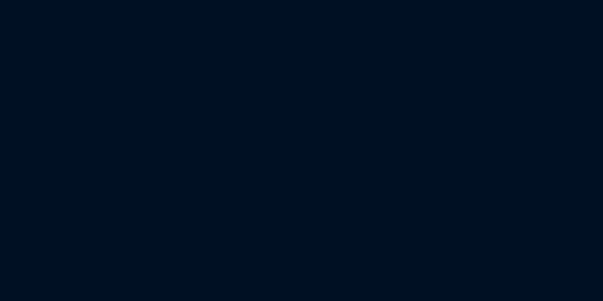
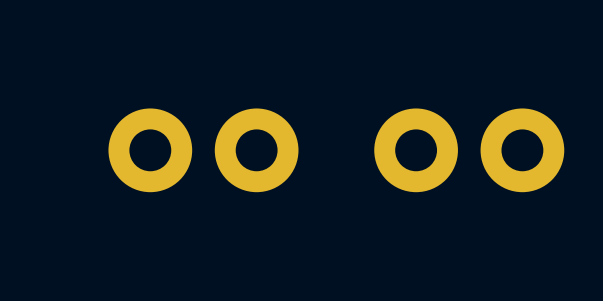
part: none -> (203, 150)
part: none -> (469, 150)

